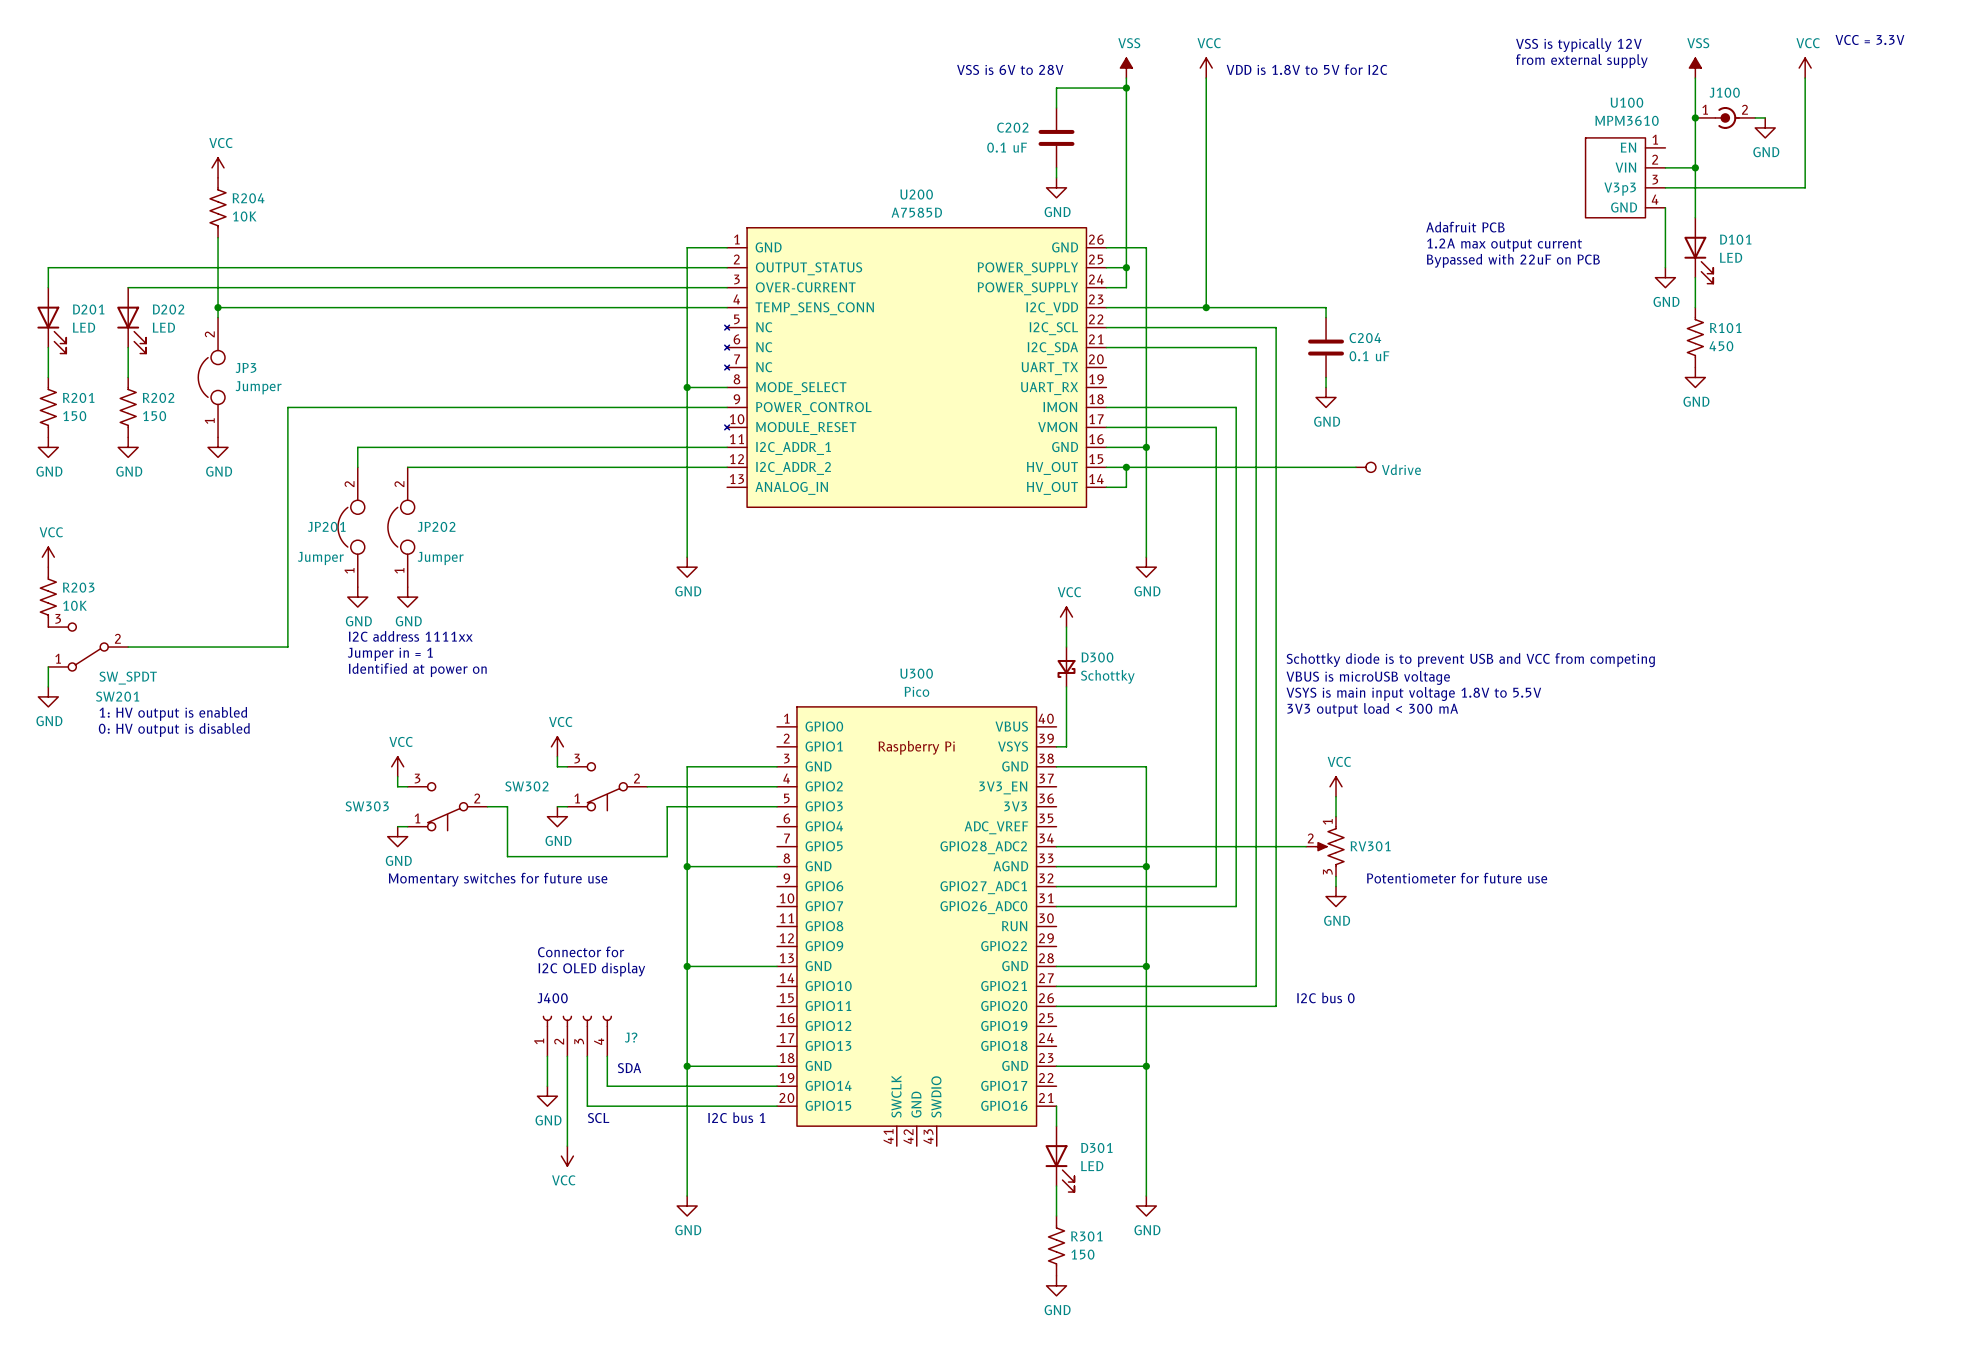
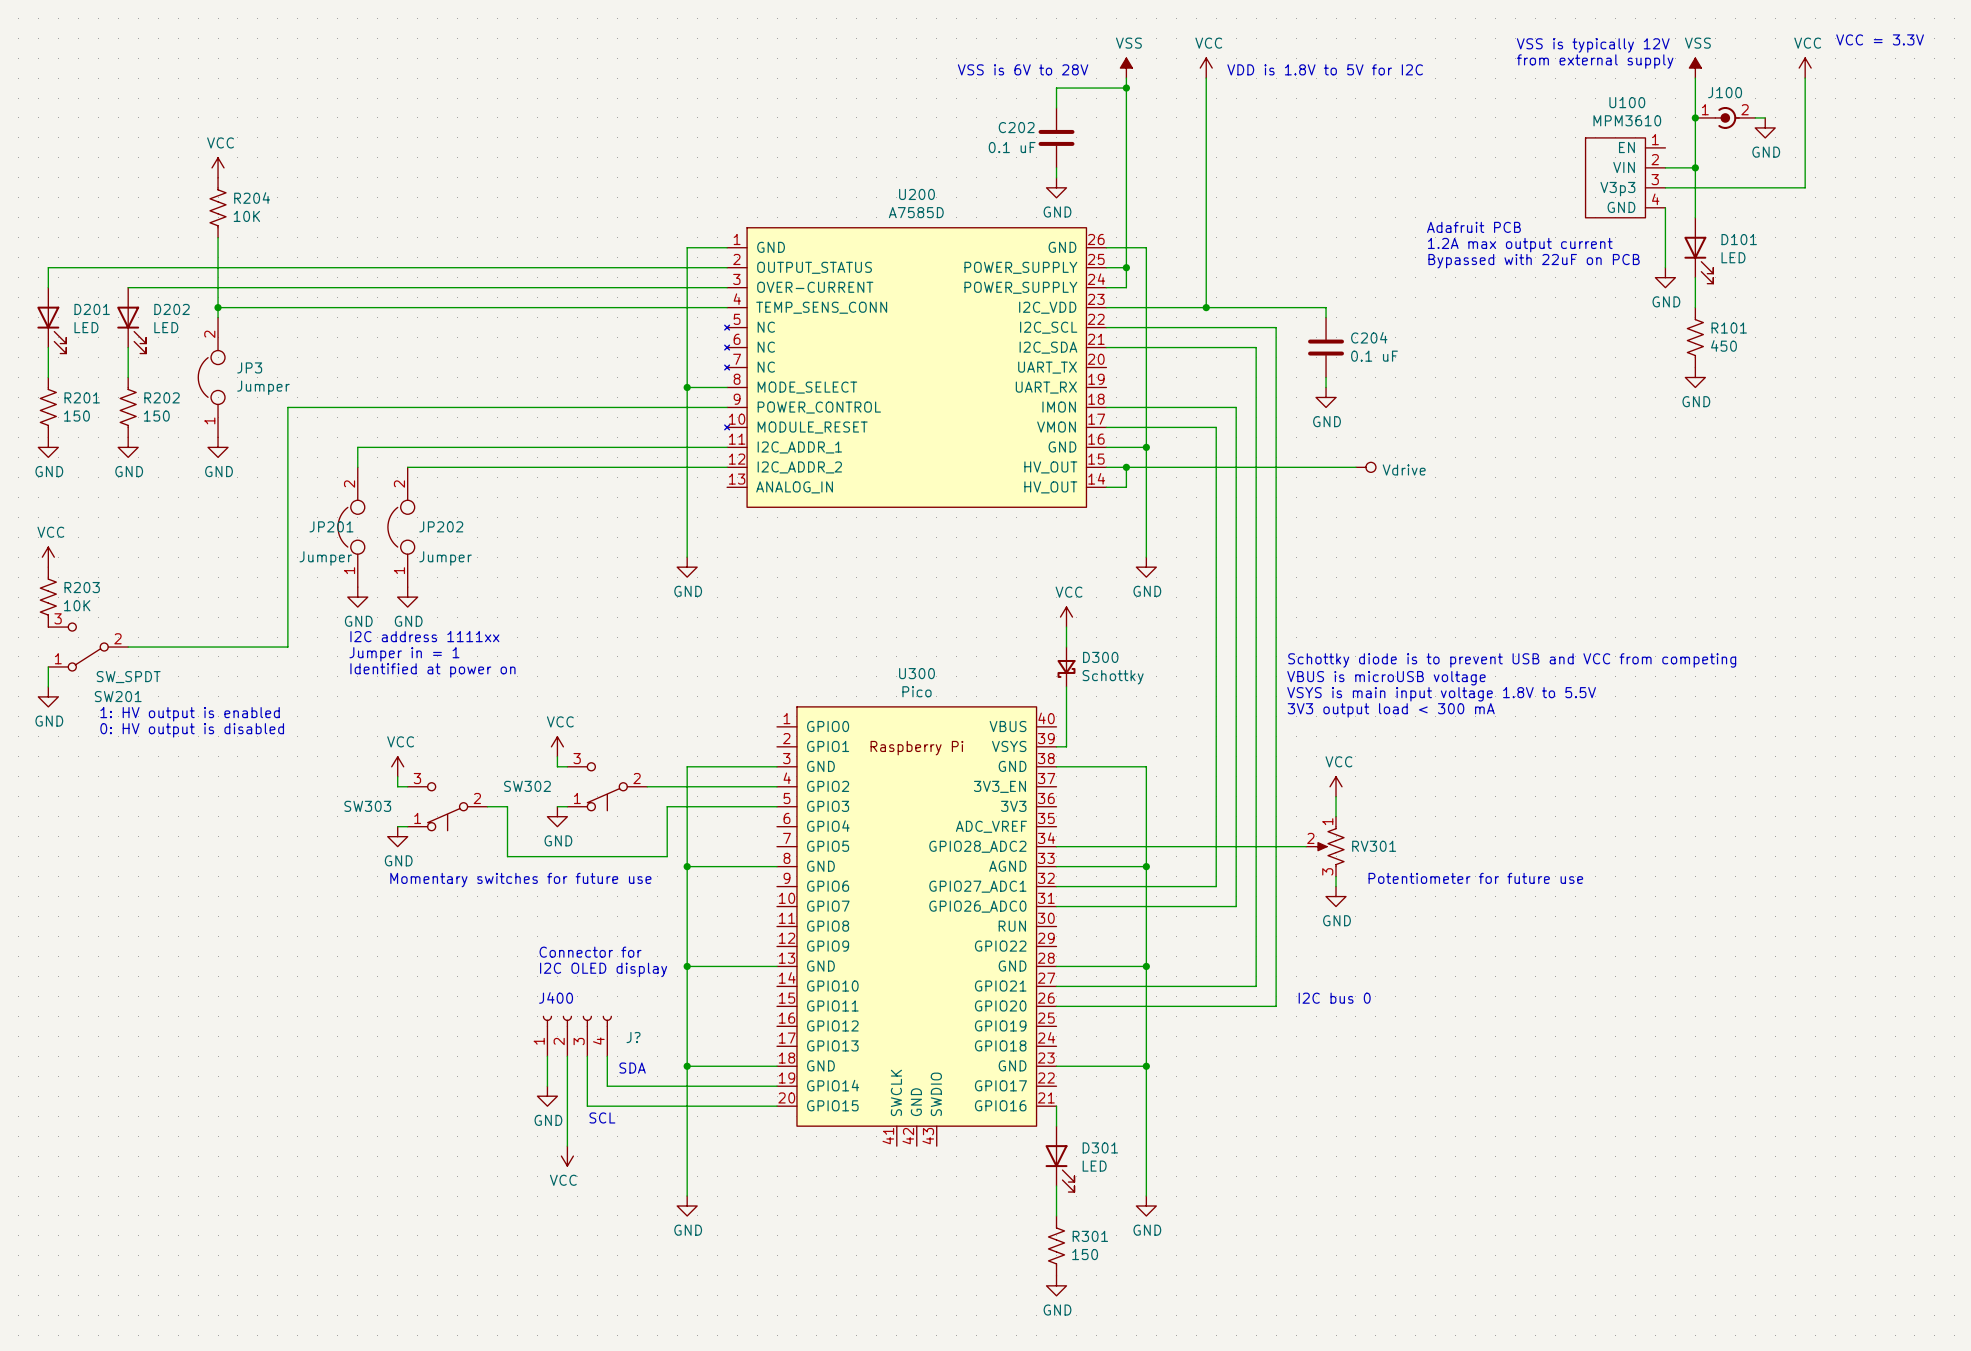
text: I2C bus 1 (736, 1117) -> none

